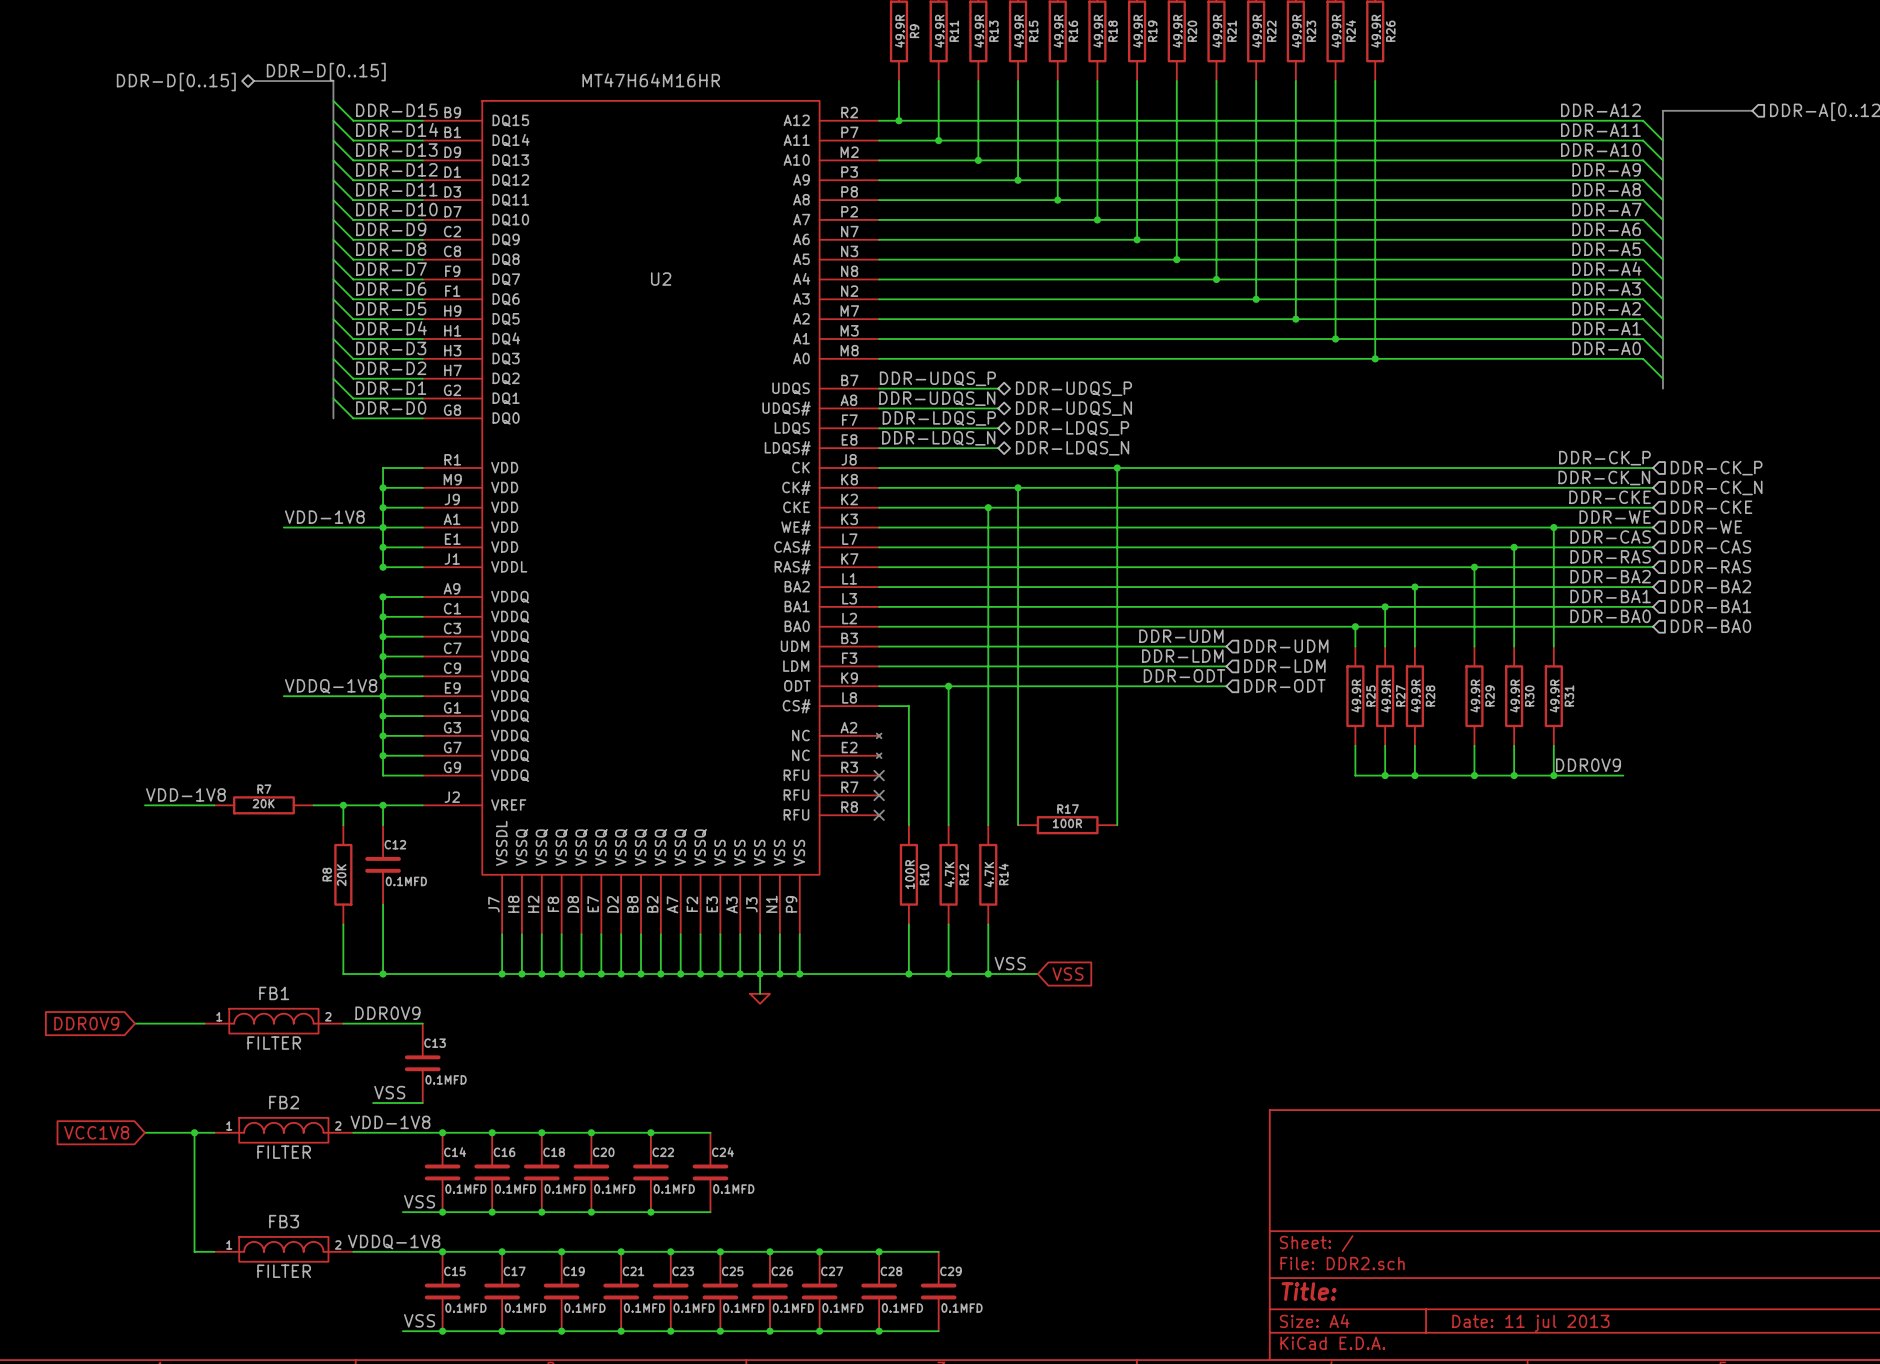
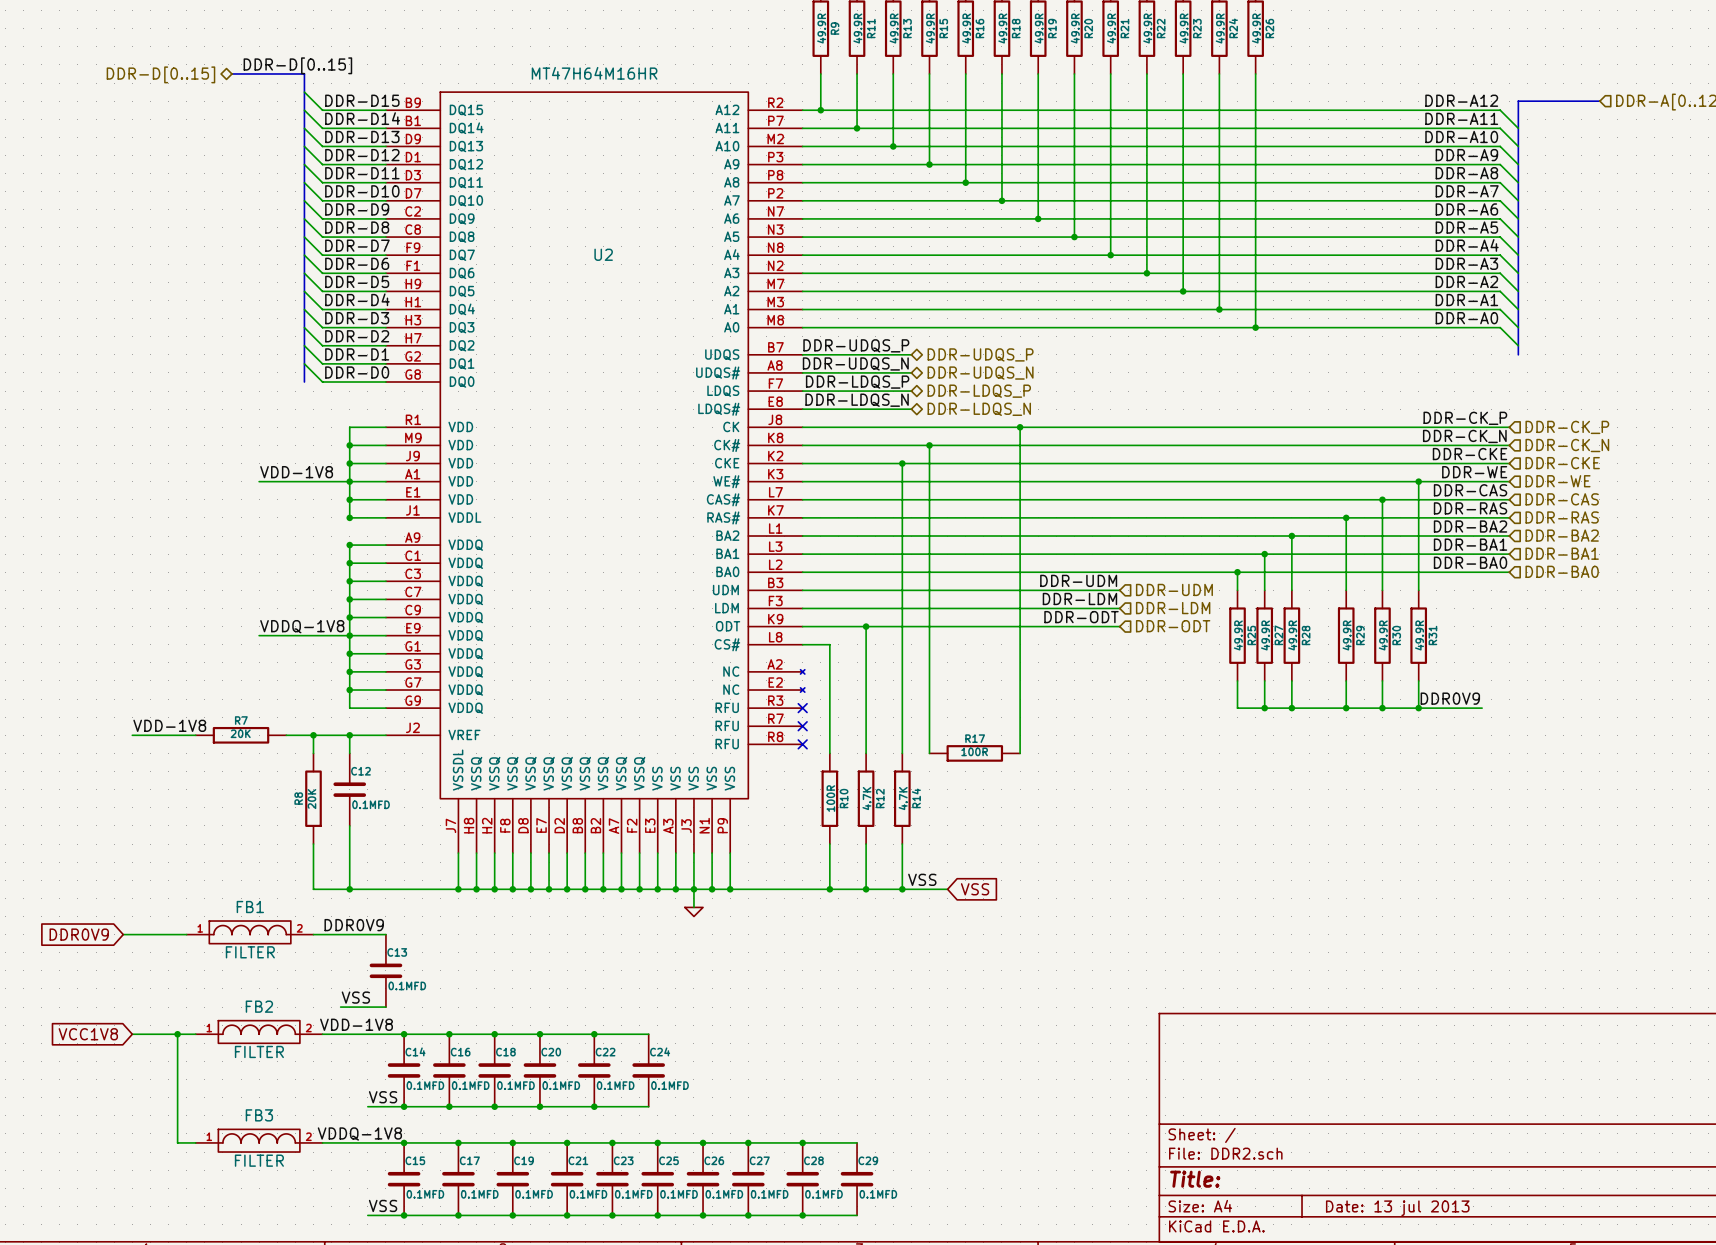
title block: Date: 11 jul 2013 (1530, 1323) -> Date: 13 jul 2013 (1397, 1208)

